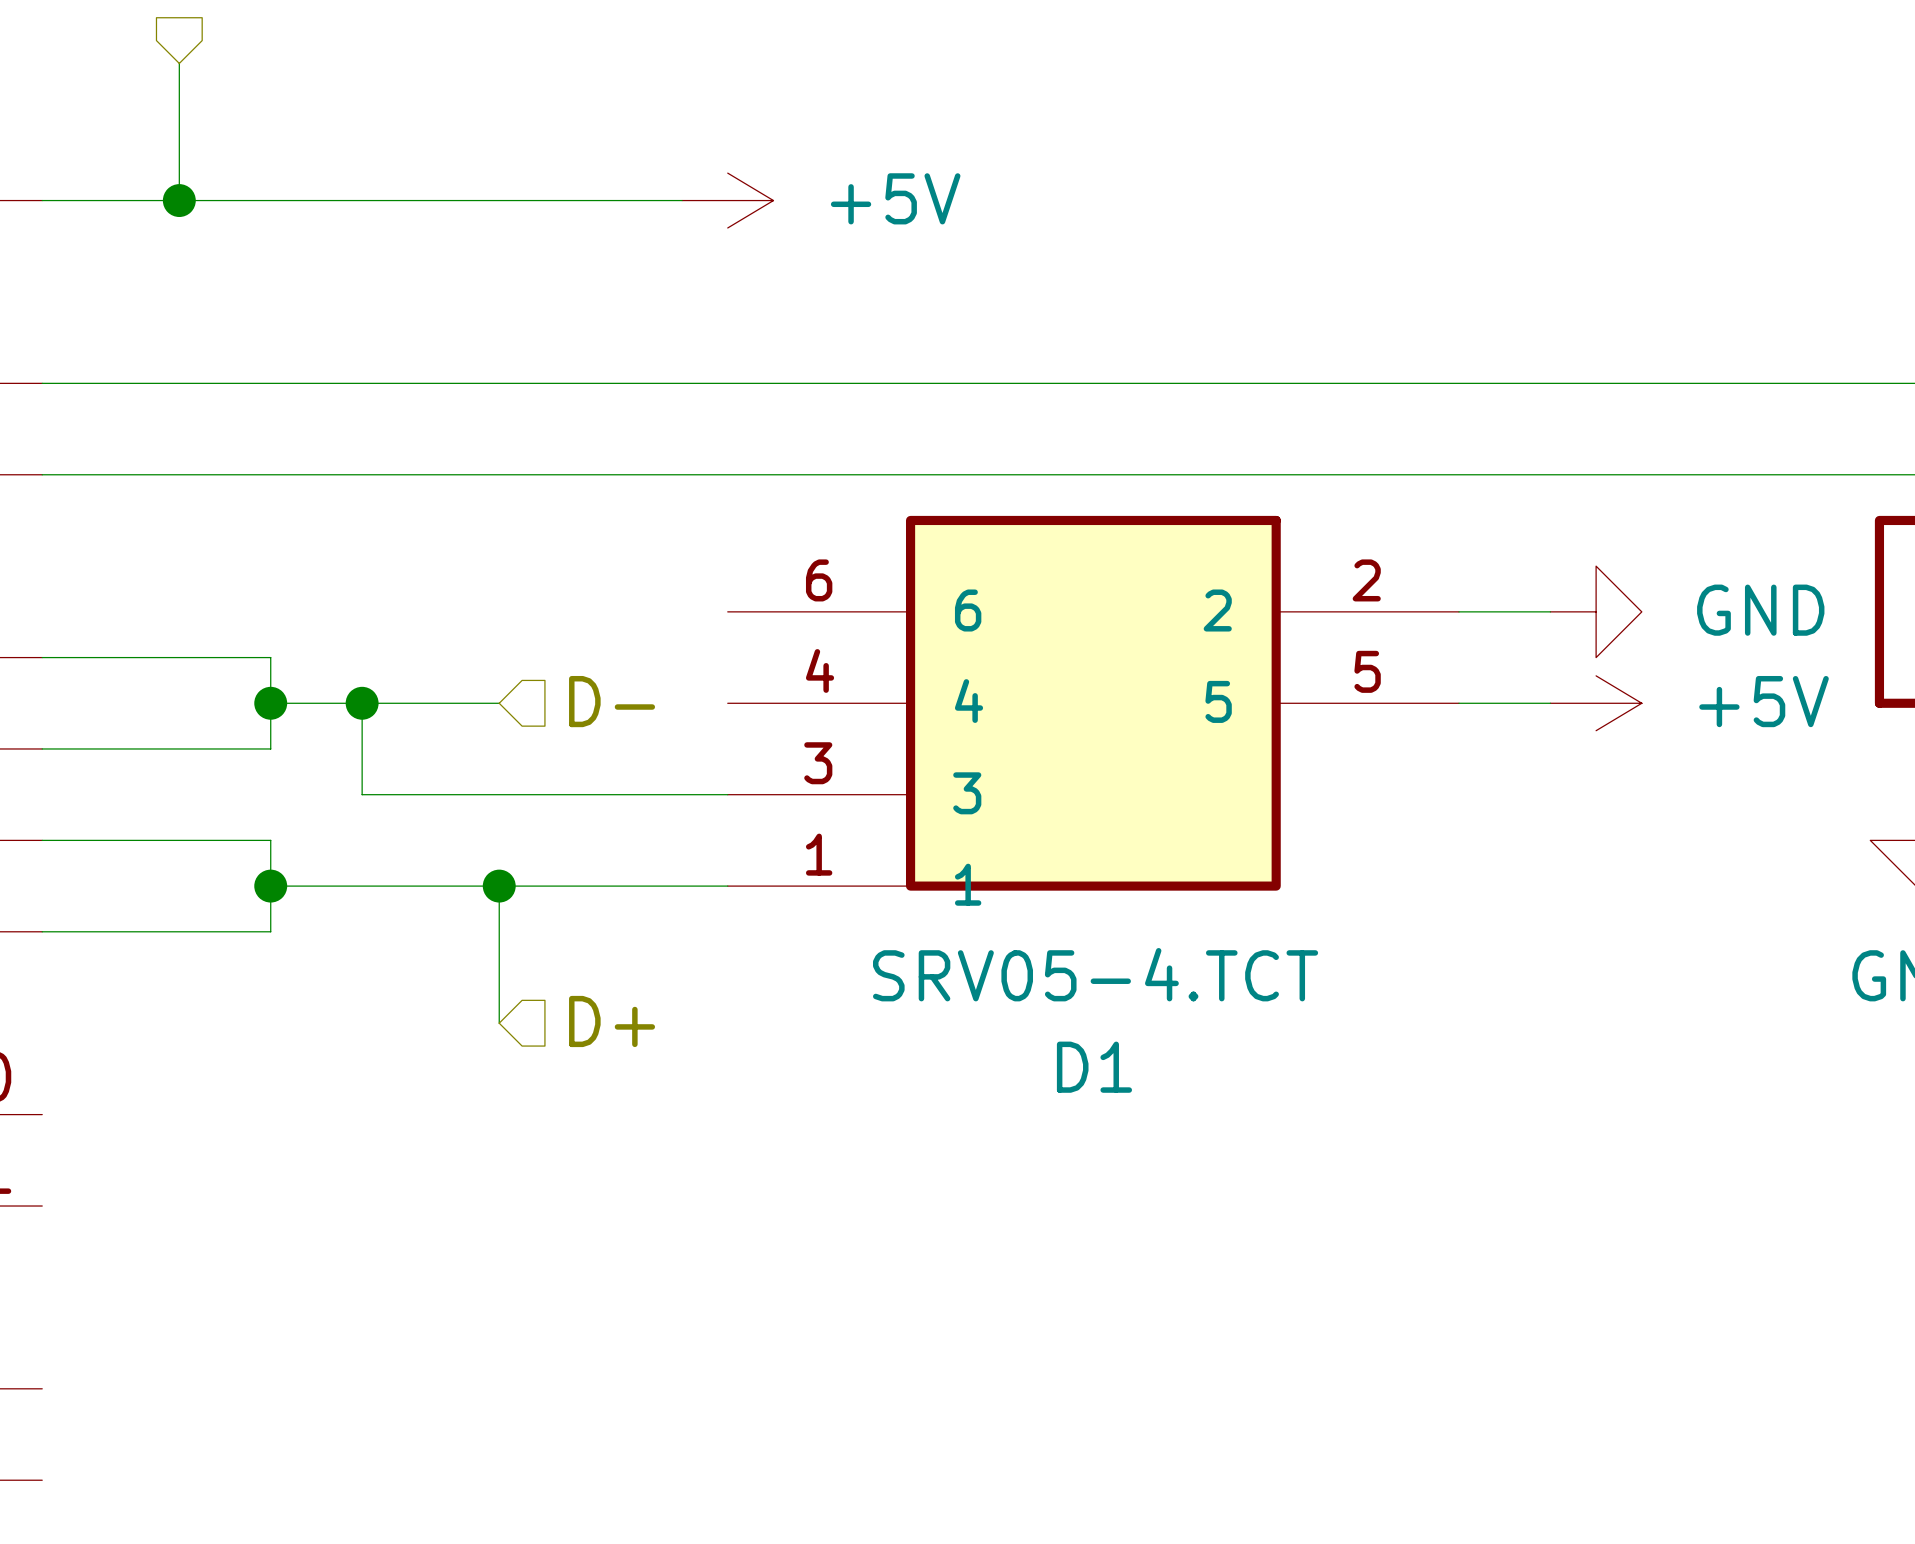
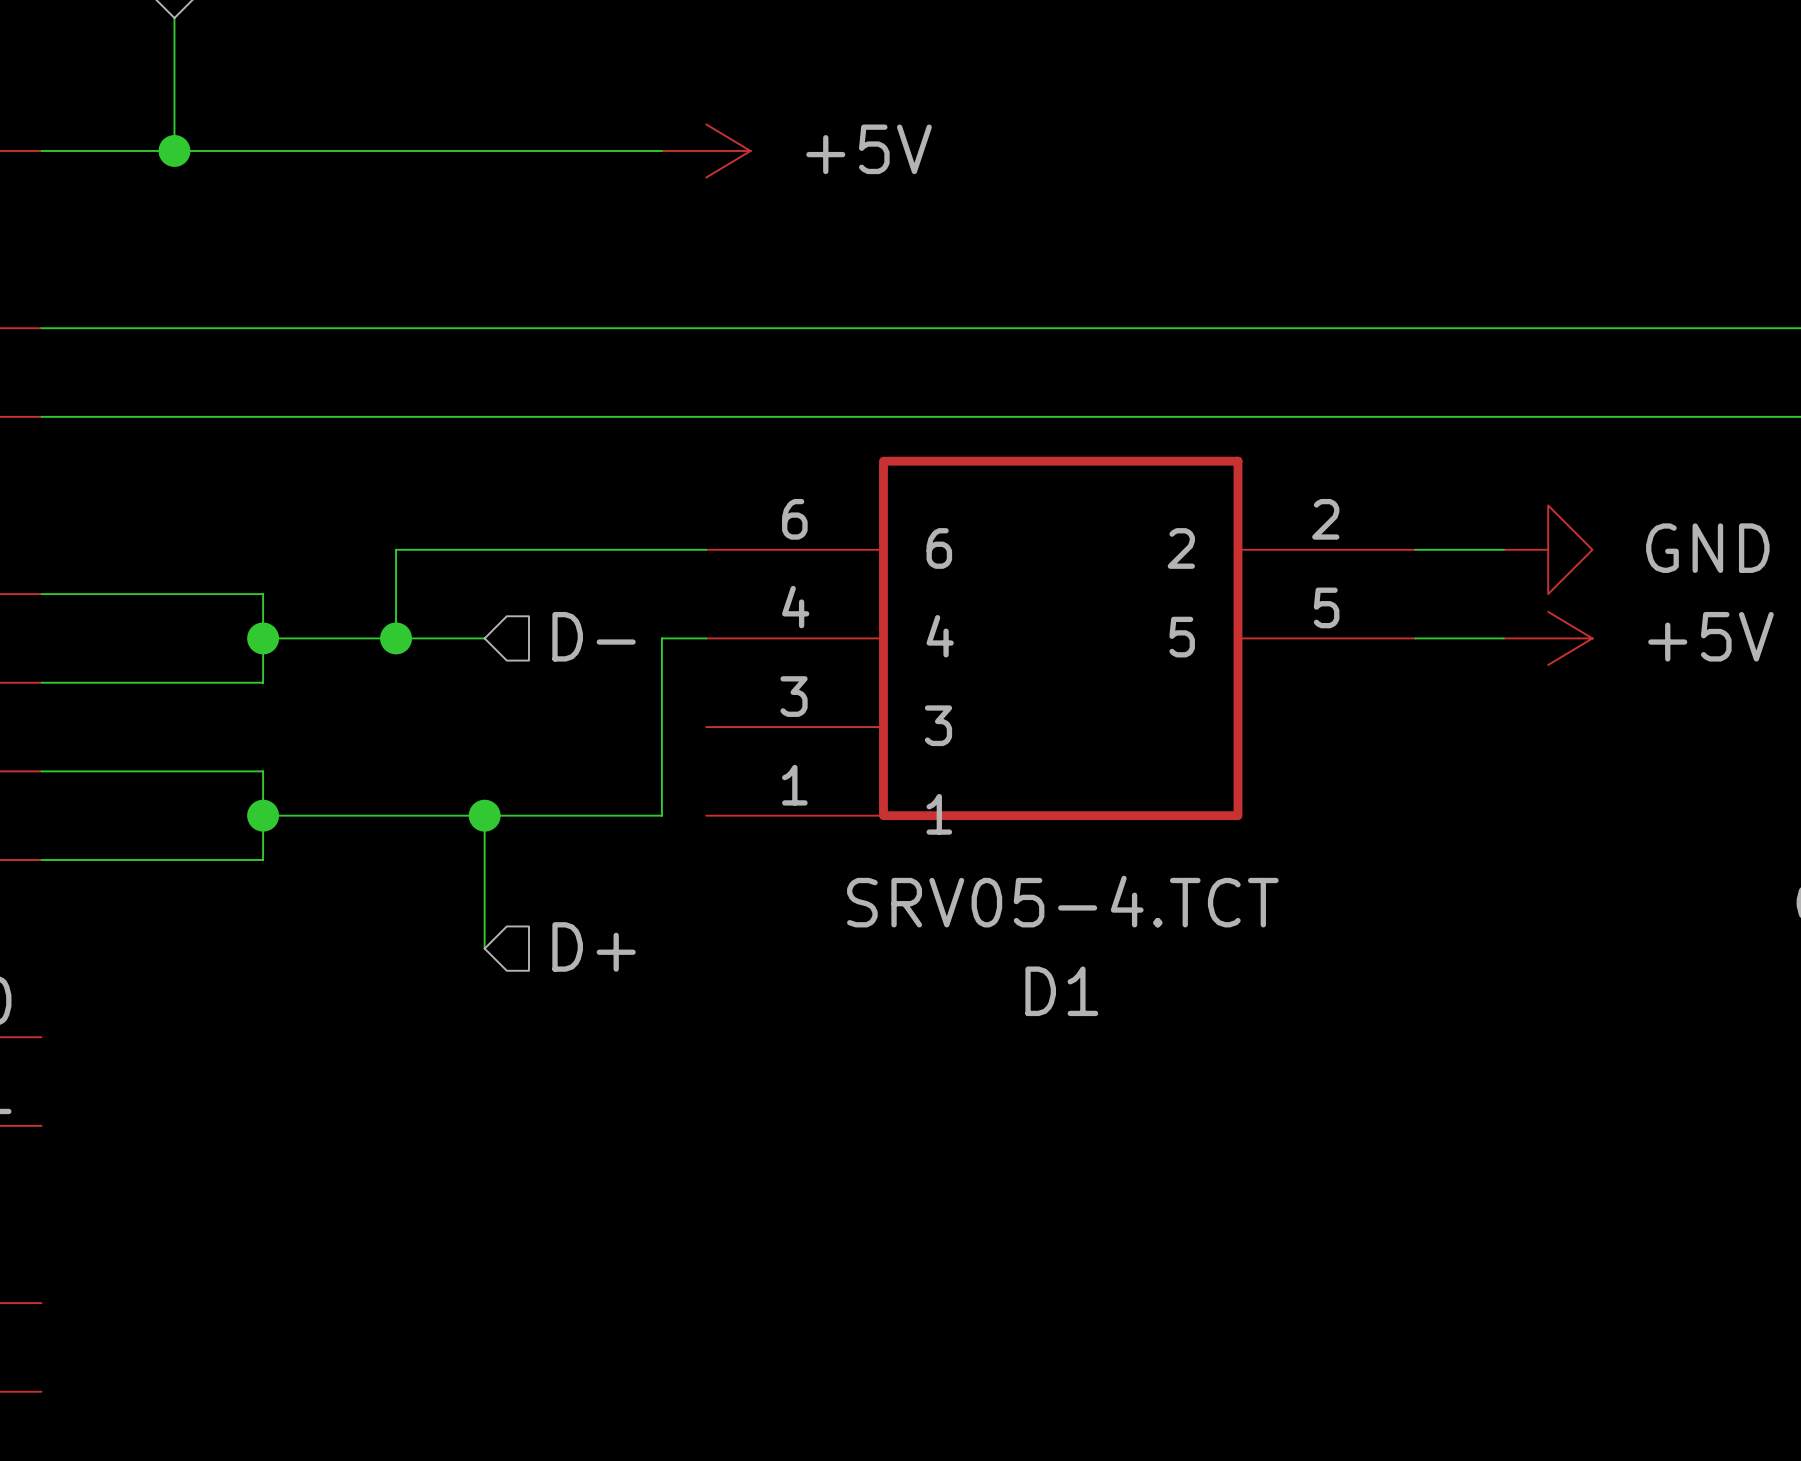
wire: none -> (706, 549) (396, 549) (396, 638)
wire: (362, 703) (362, 794) (727, 794) -> none
junction position: (362, 703) -> (396, 638)
wire: (682, 886) (727, 886) -> (661, 815) (661, 638) (706, 638)

